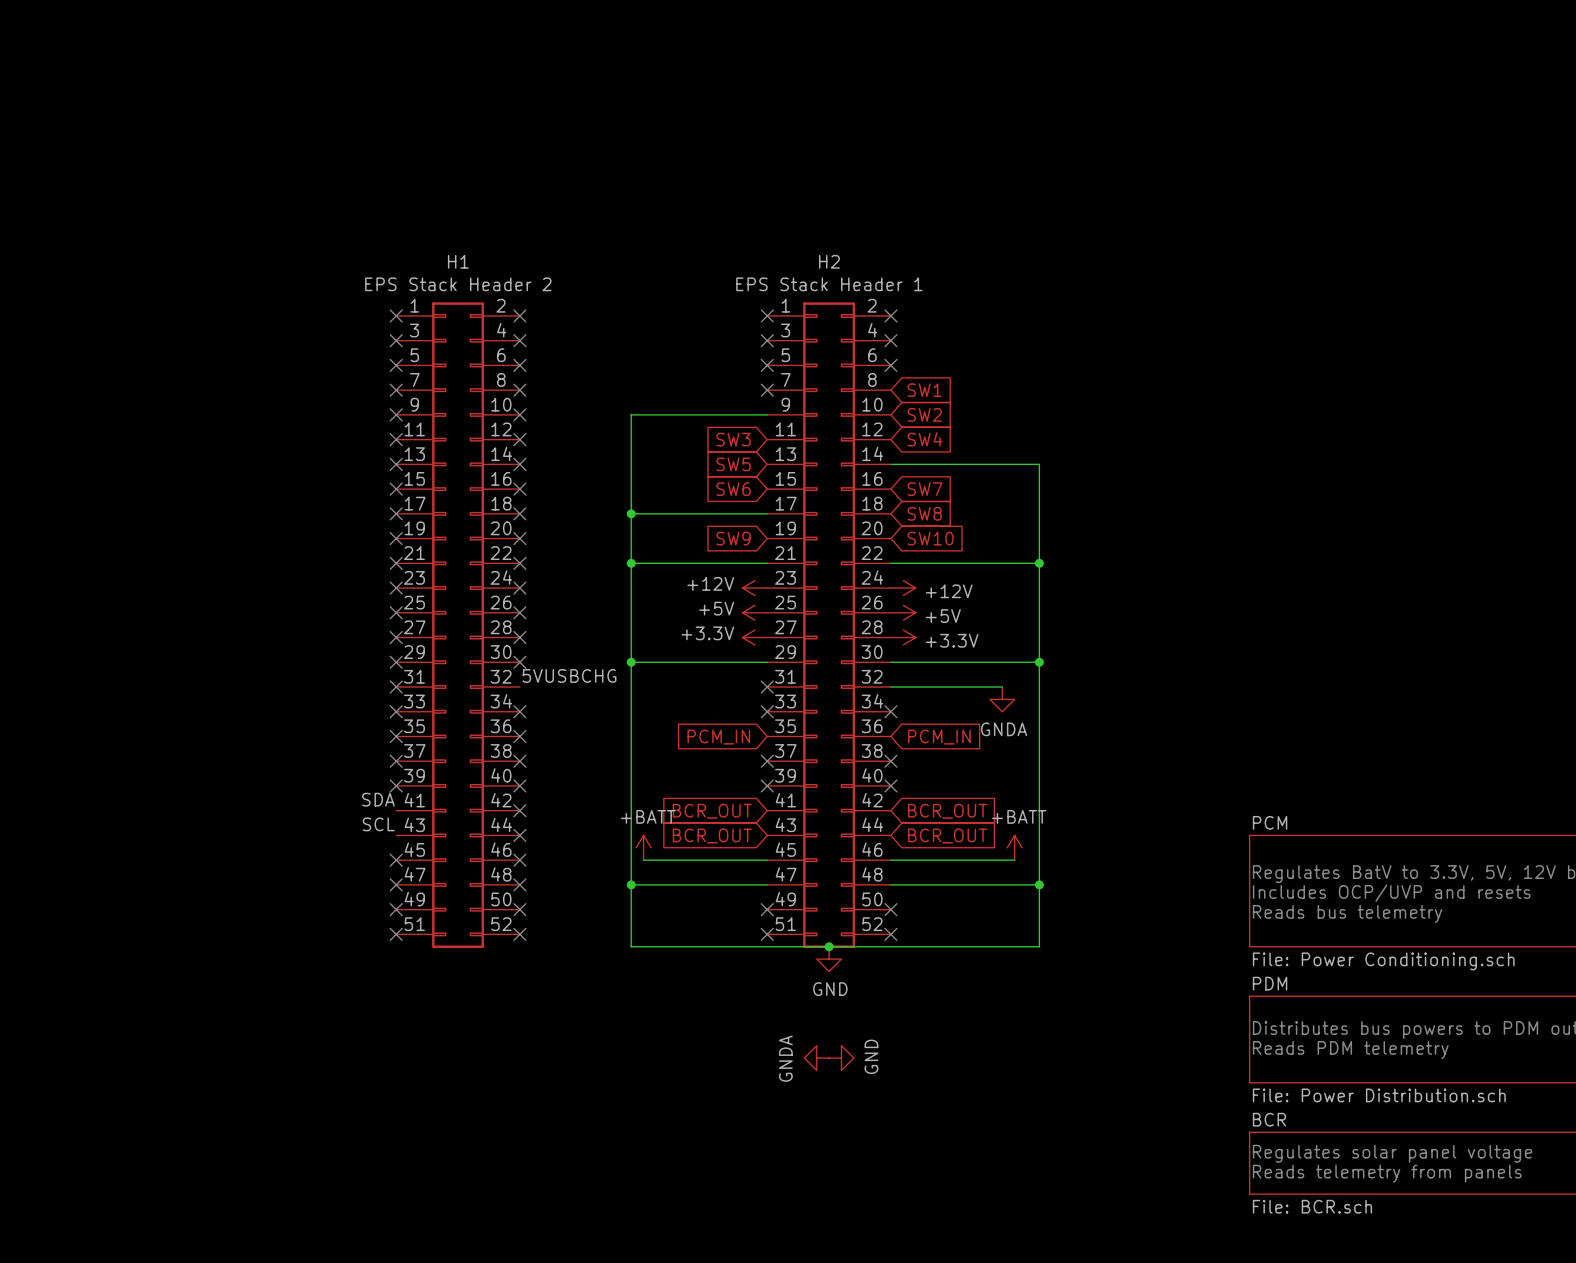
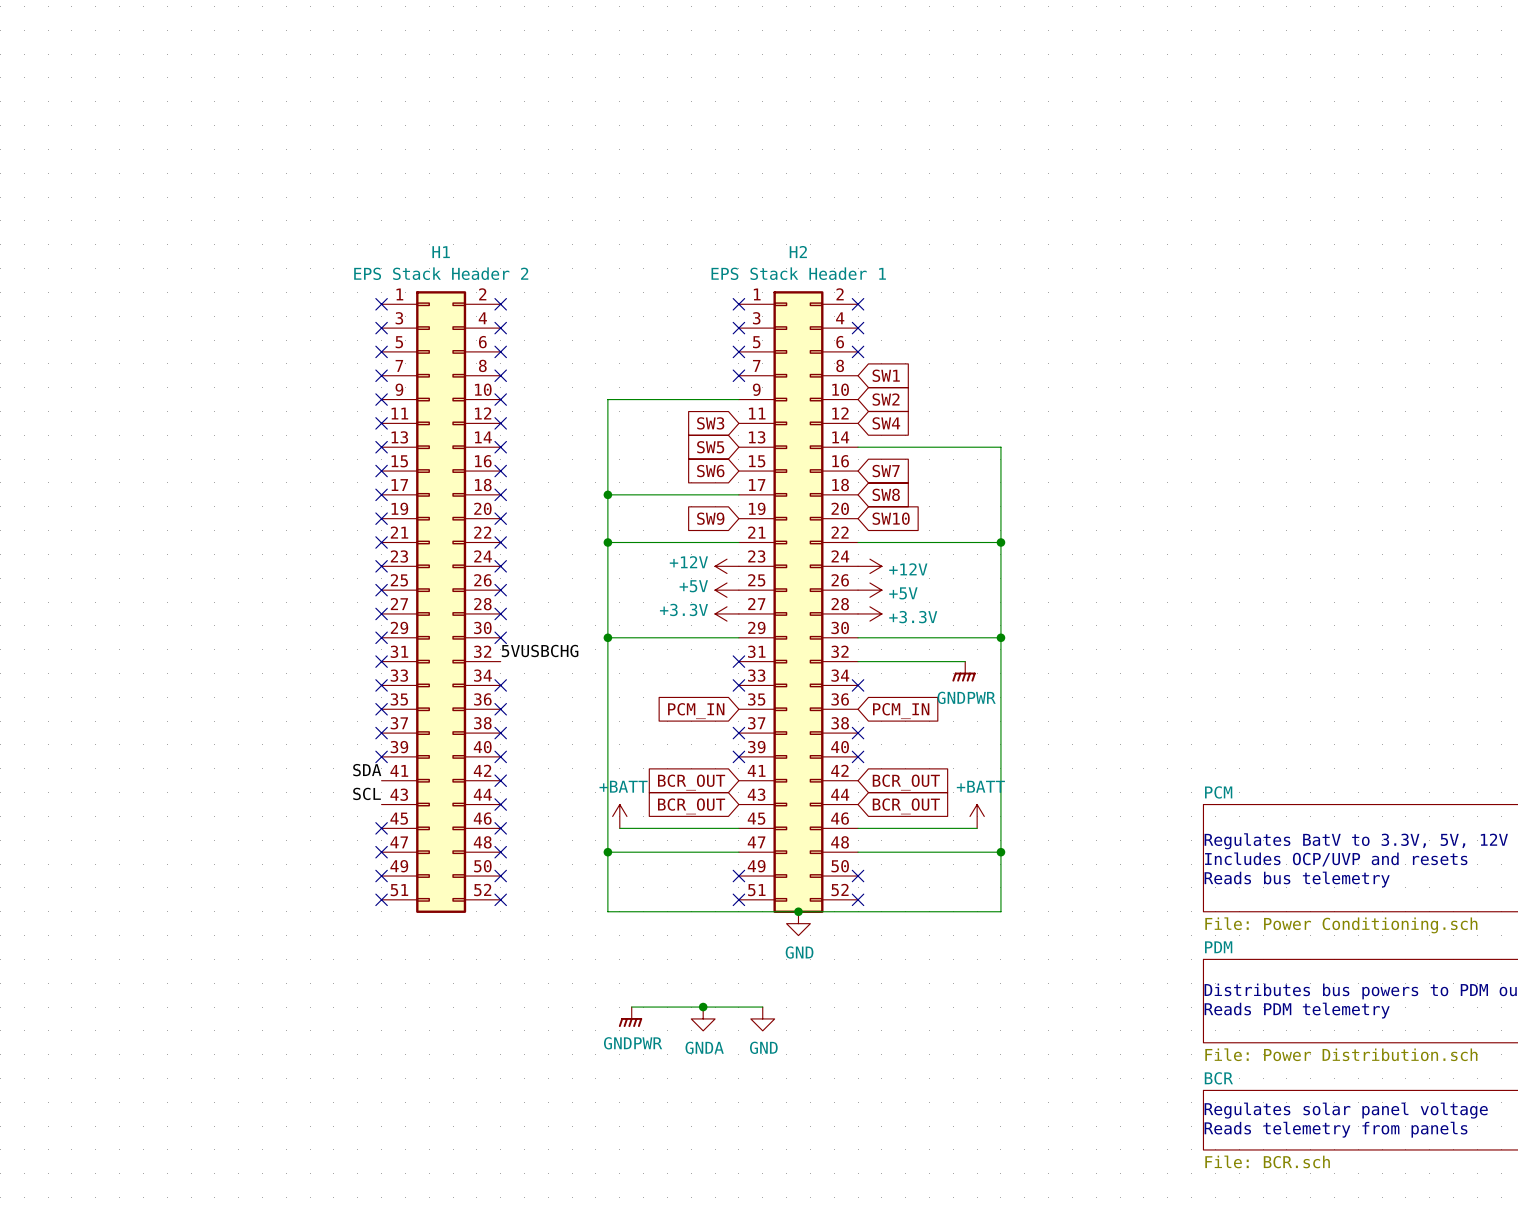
power symbol: GNDA (1002, 699) -> GNDPWR (964, 671)
wire: none -> (631, 1007) (762, 1007)
junction: none -> (703, 1007)
power symbol: none -> GNDPWR (630, 1017)
power symbol rotation: 0° (816, 1058) -> 90° counterclockwise (703, 1018)
power symbol position: GNDA (816, 1058) -> GNDA (703, 1018)
power symbol rotation: 0° (841, 1058) -> 90° clockwise (762, 1018)
power symbol position: GND (841, 1058) -> GND (762, 1018)

